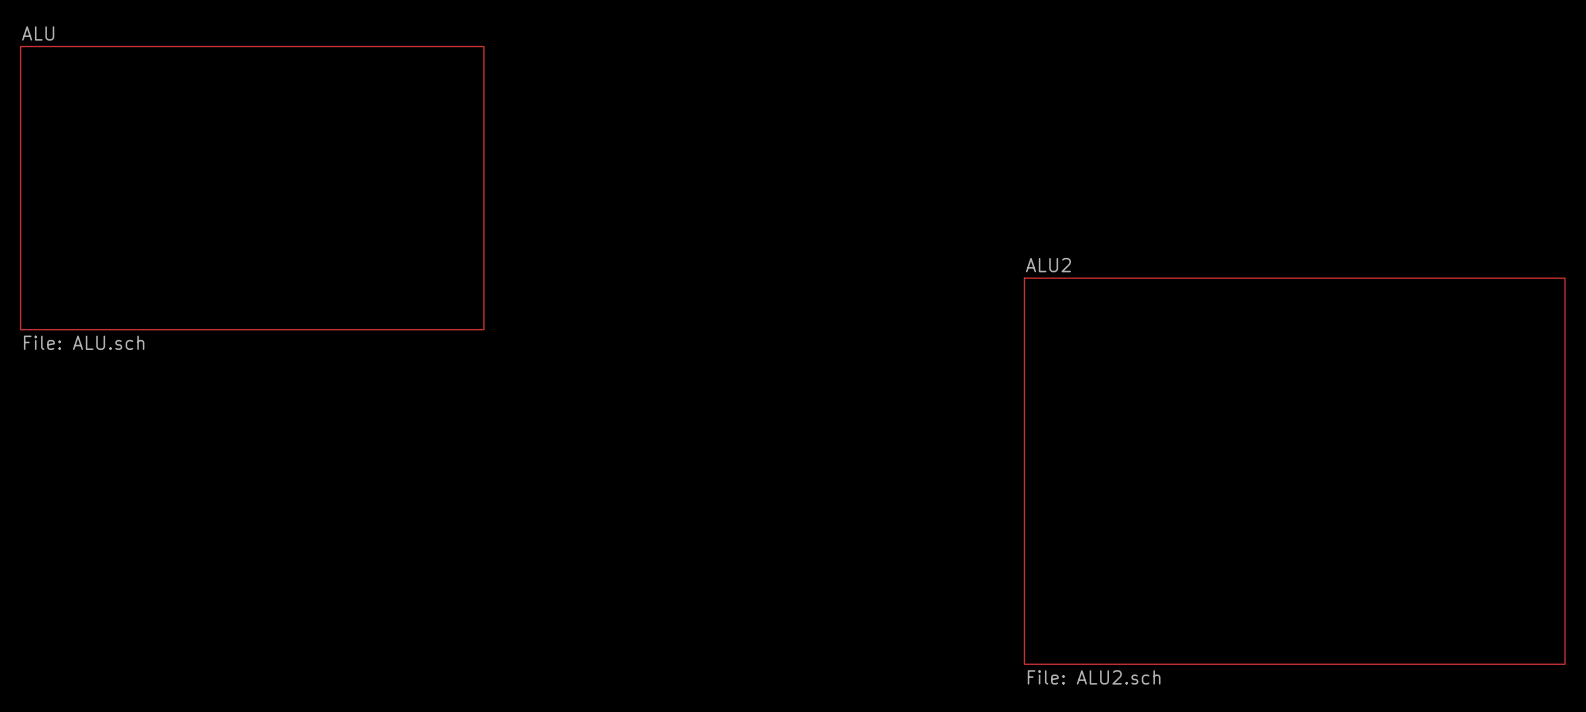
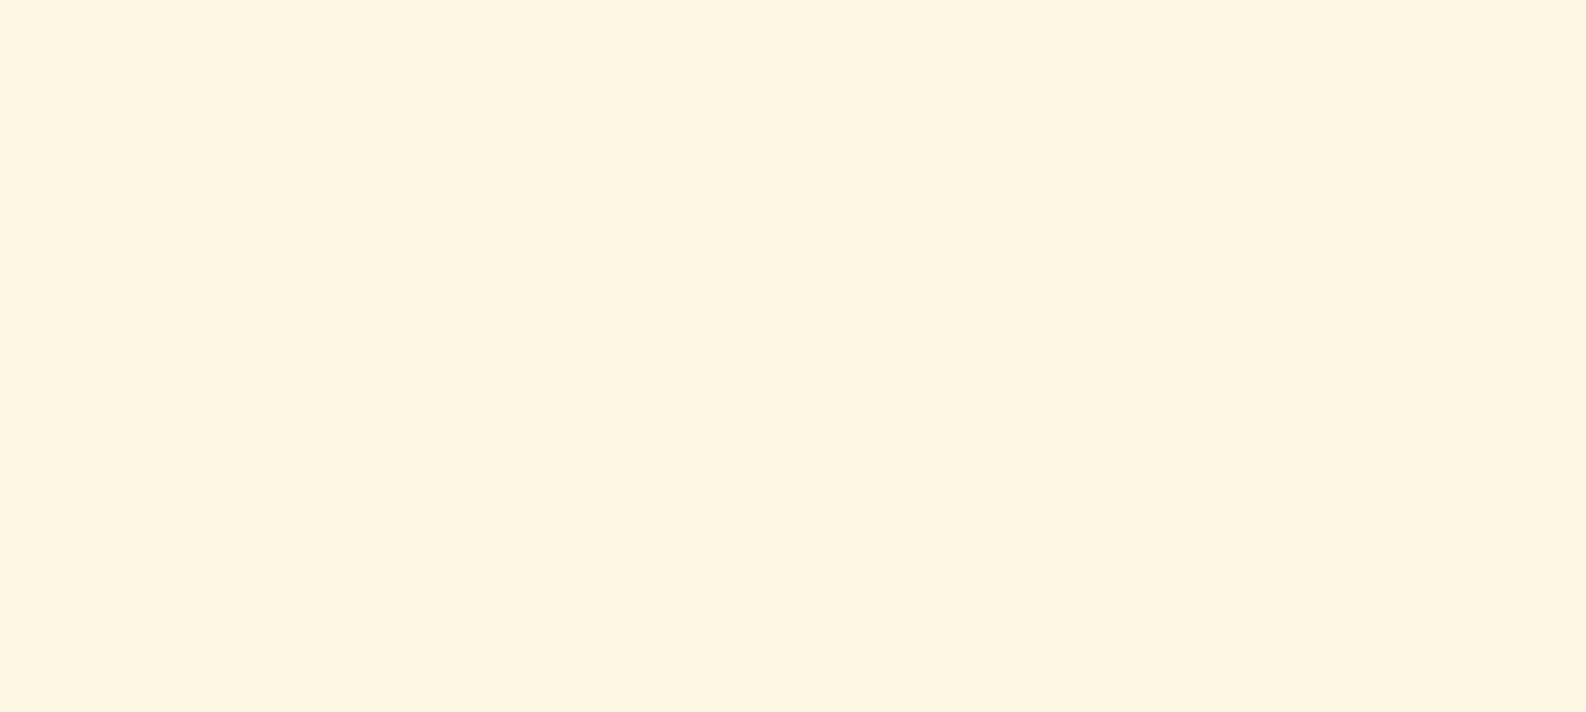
sheet ALU: File: ALU.sch (252, 188) -> none
sheet ALU2: File: ALU2.sch (1294, 471) -> none

